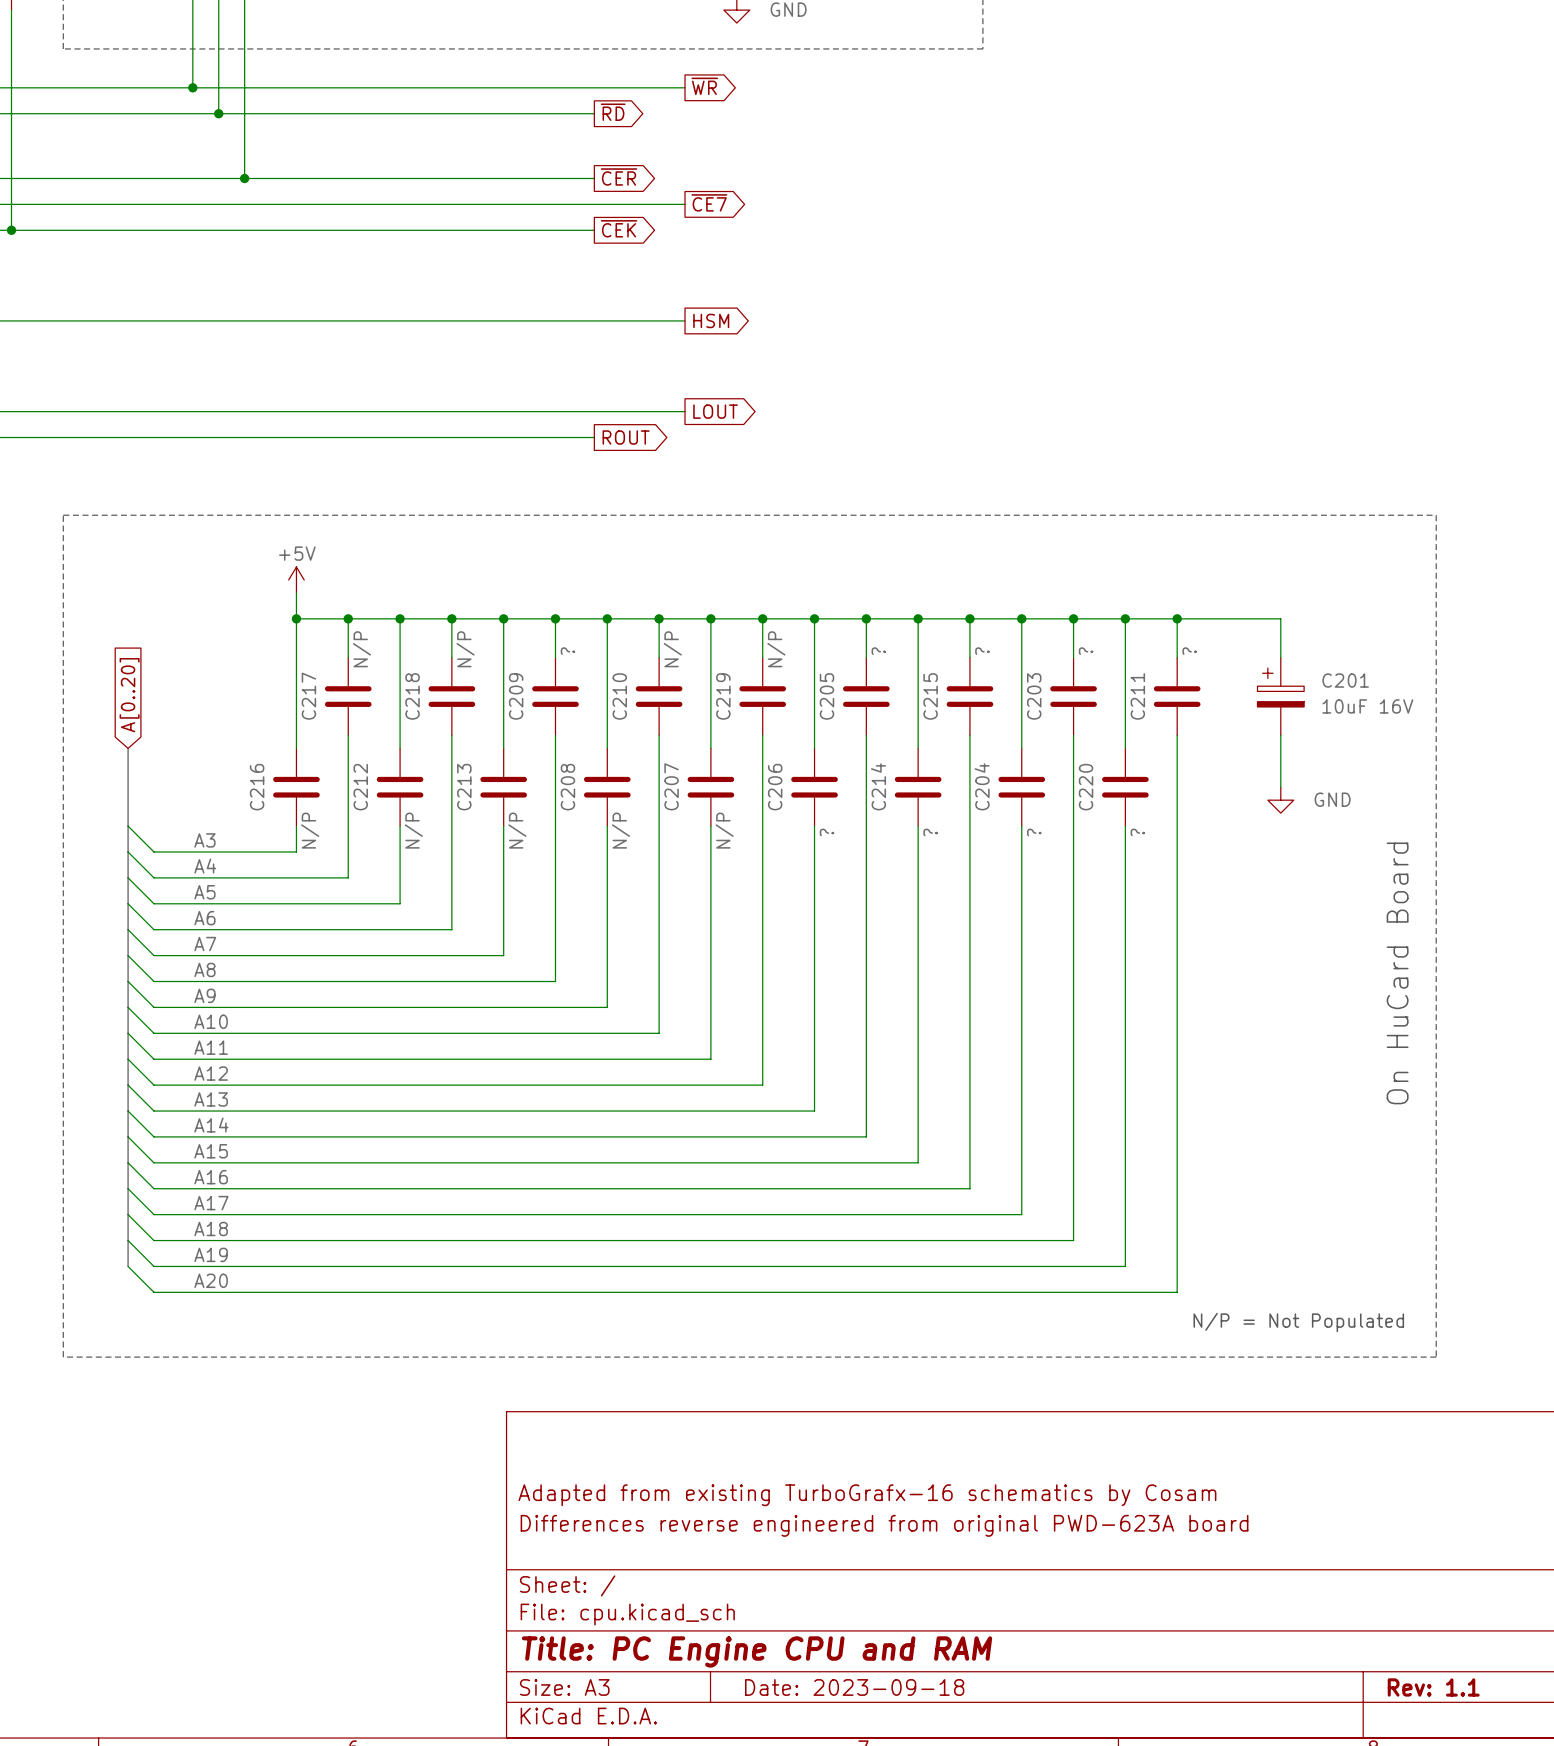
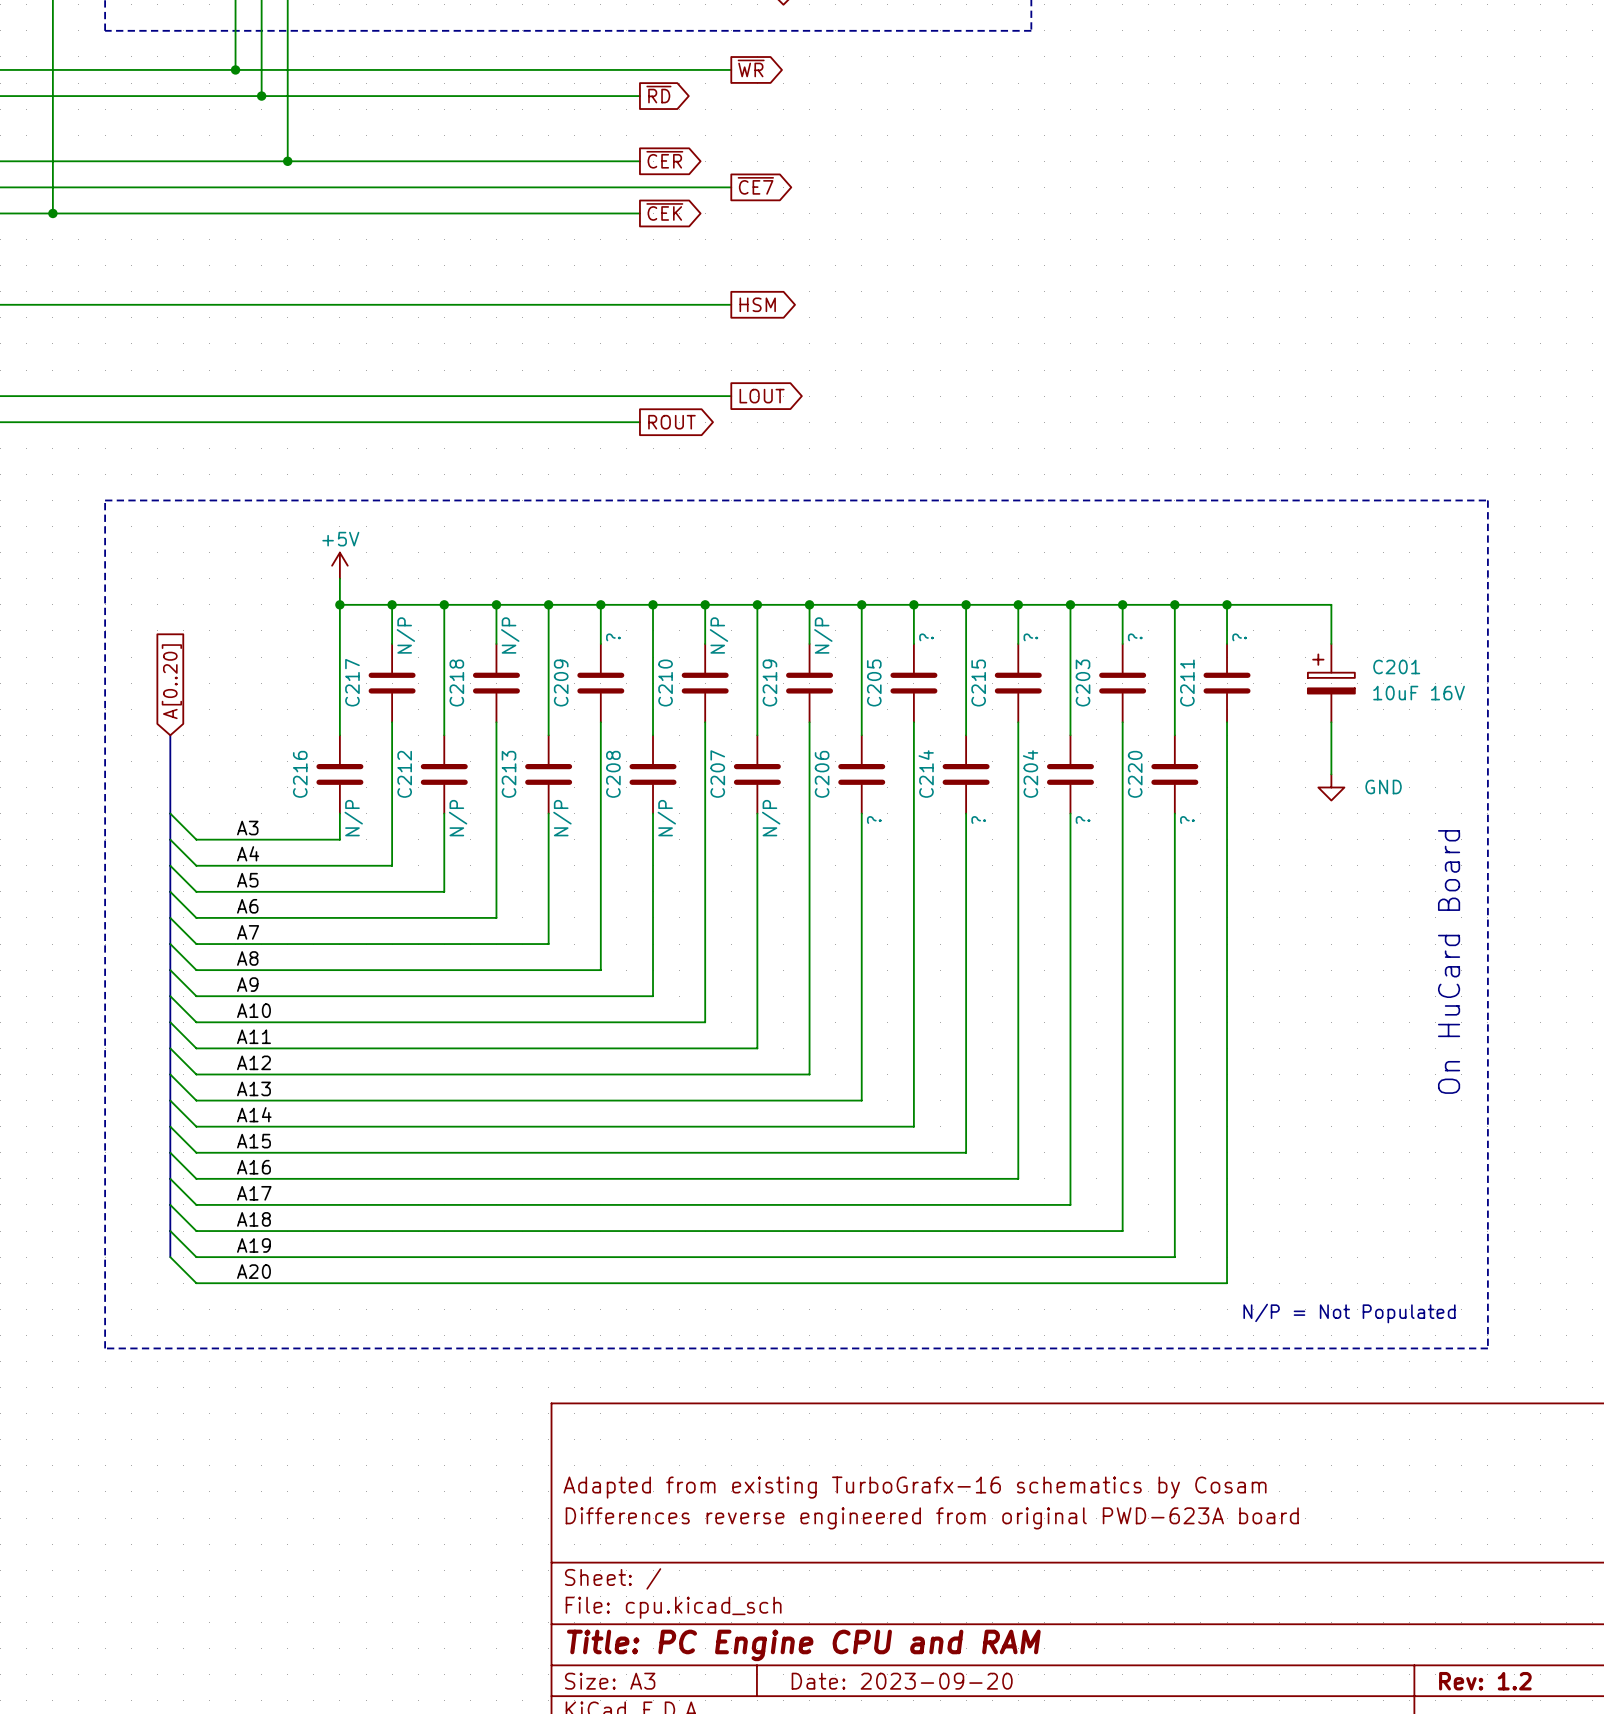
title block: Date: 2023-09-18 (854, 1687) -> Date: 2023-09-20 (902, 1681)
title block: Rev: 1.1 (1433, 1687) -> Rev: 1.2 (1485, 1681)

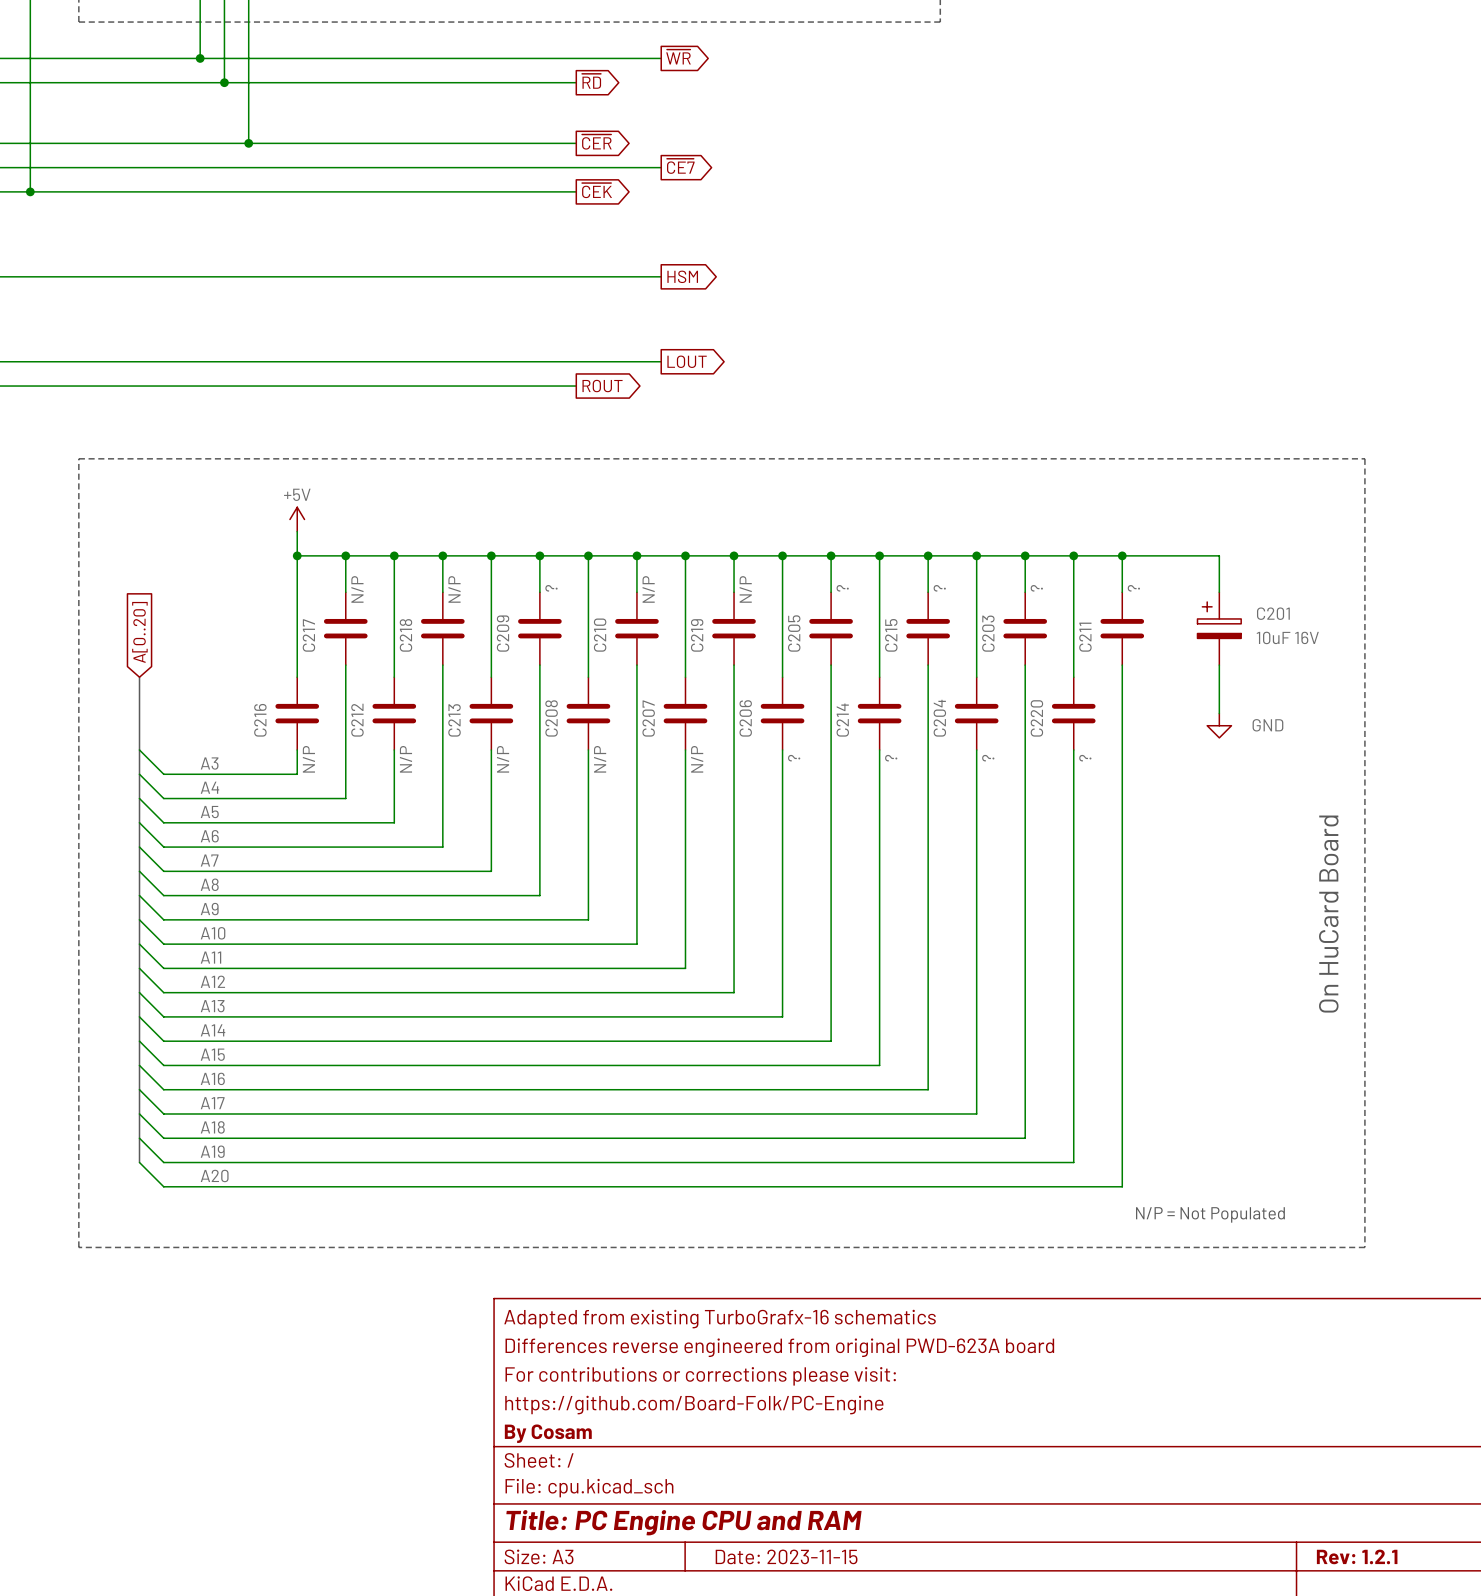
title block: none -> Adapted from existing TurboGrafx-16 schematics (720, 1319)
title block: none -> Differences reverse engineered from original PWD-623A board (779, 1347)
title block: Adapted from existing TurboGrafx-16 schematics by Cosam (915, 1487) -> For contributions or corrections please visit: (700, 1376)
title block: Differences reverse engineered from original PWD-623A board (932, 1518) -> https://github.com/Board-Folk/PC-Engine (694, 1405)
title block: none -> By Cosam (548, 1433)
title block: Date: 2023-09-20 (902, 1681) -> Date: 2023-11-15 (786, 1556)
title block: Rev: 1.2 (1485, 1681) -> Rev: 1.2.1 (1357, 1556)

